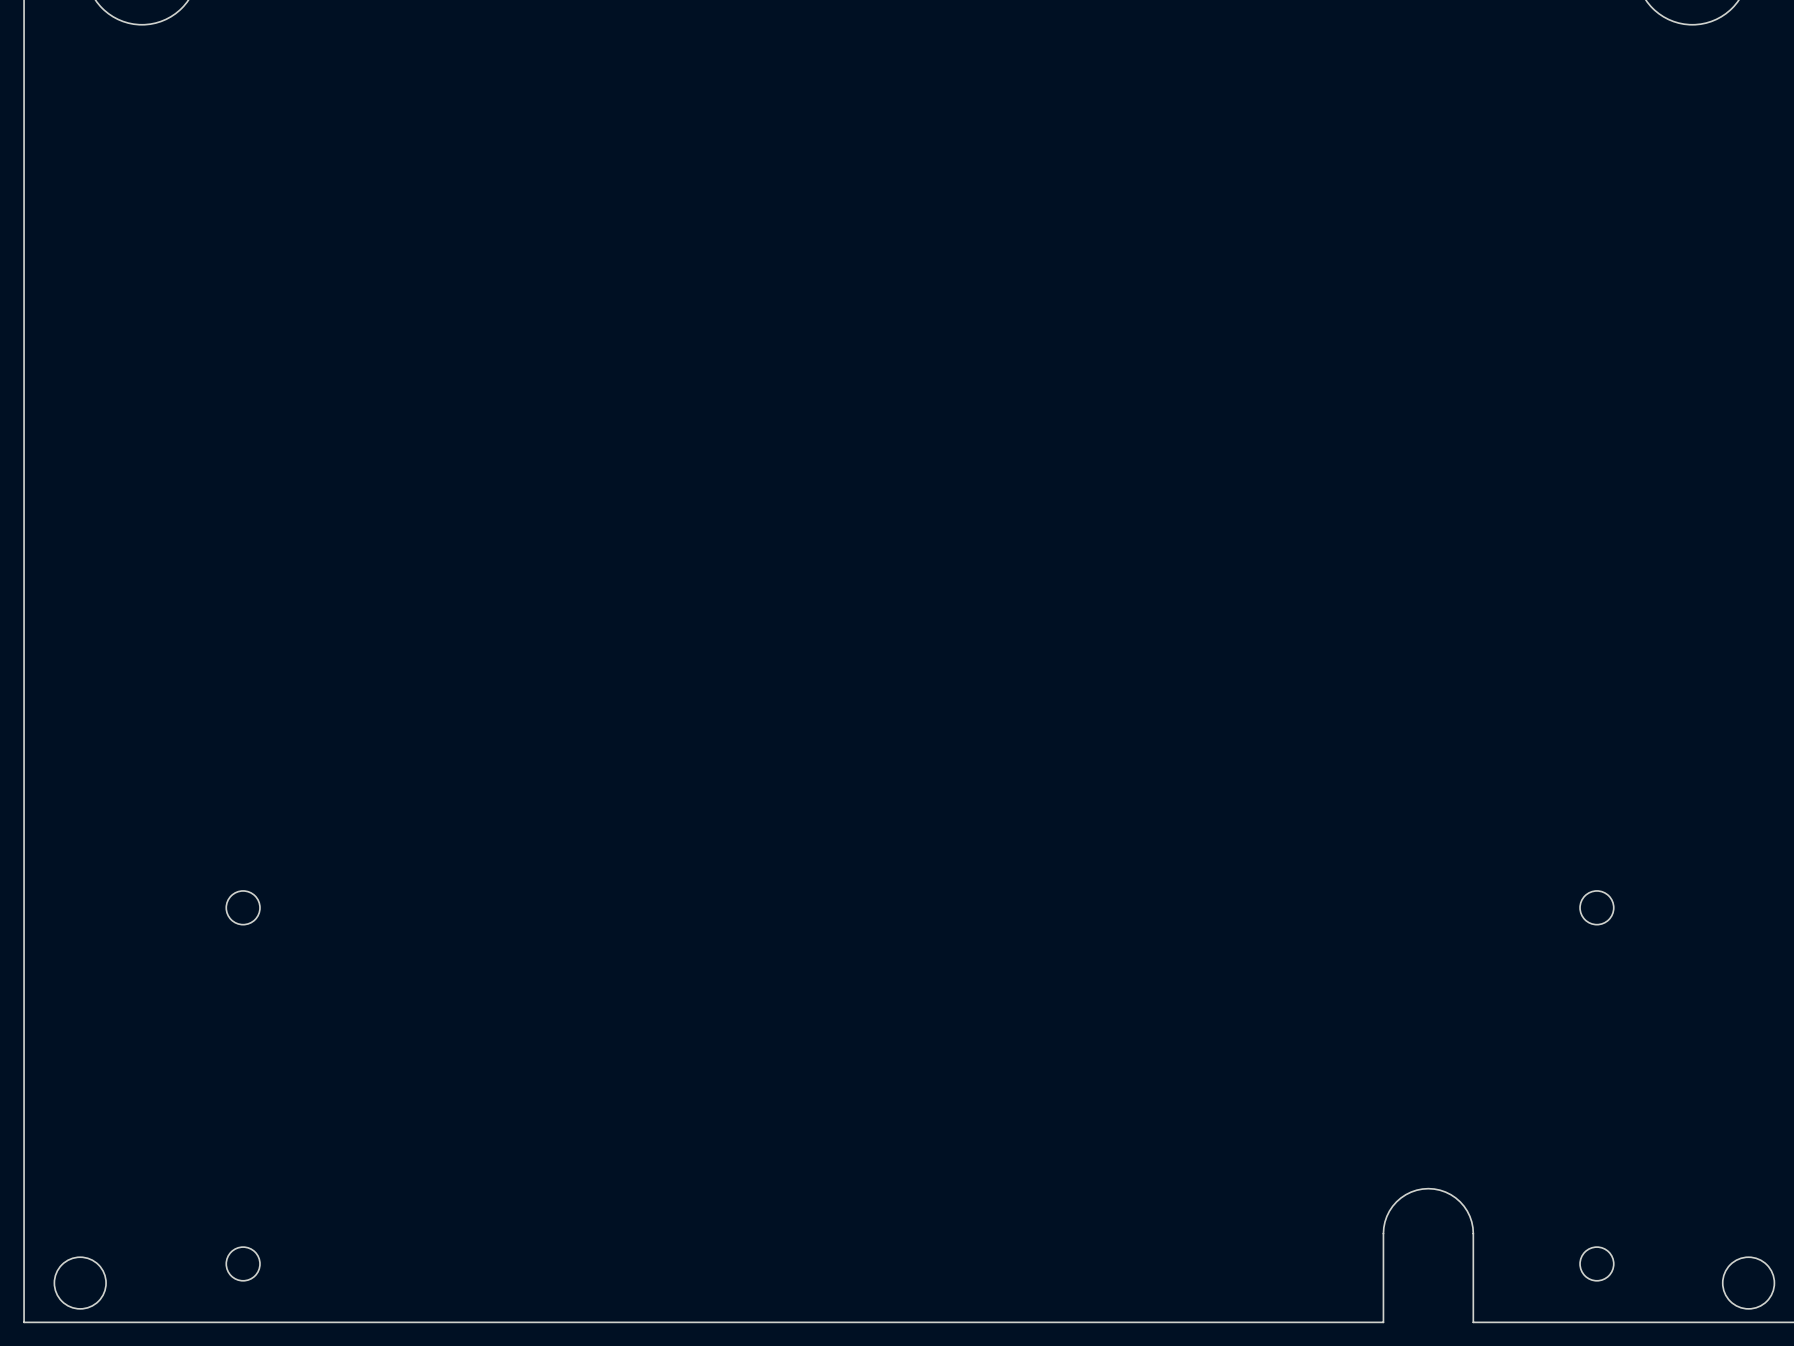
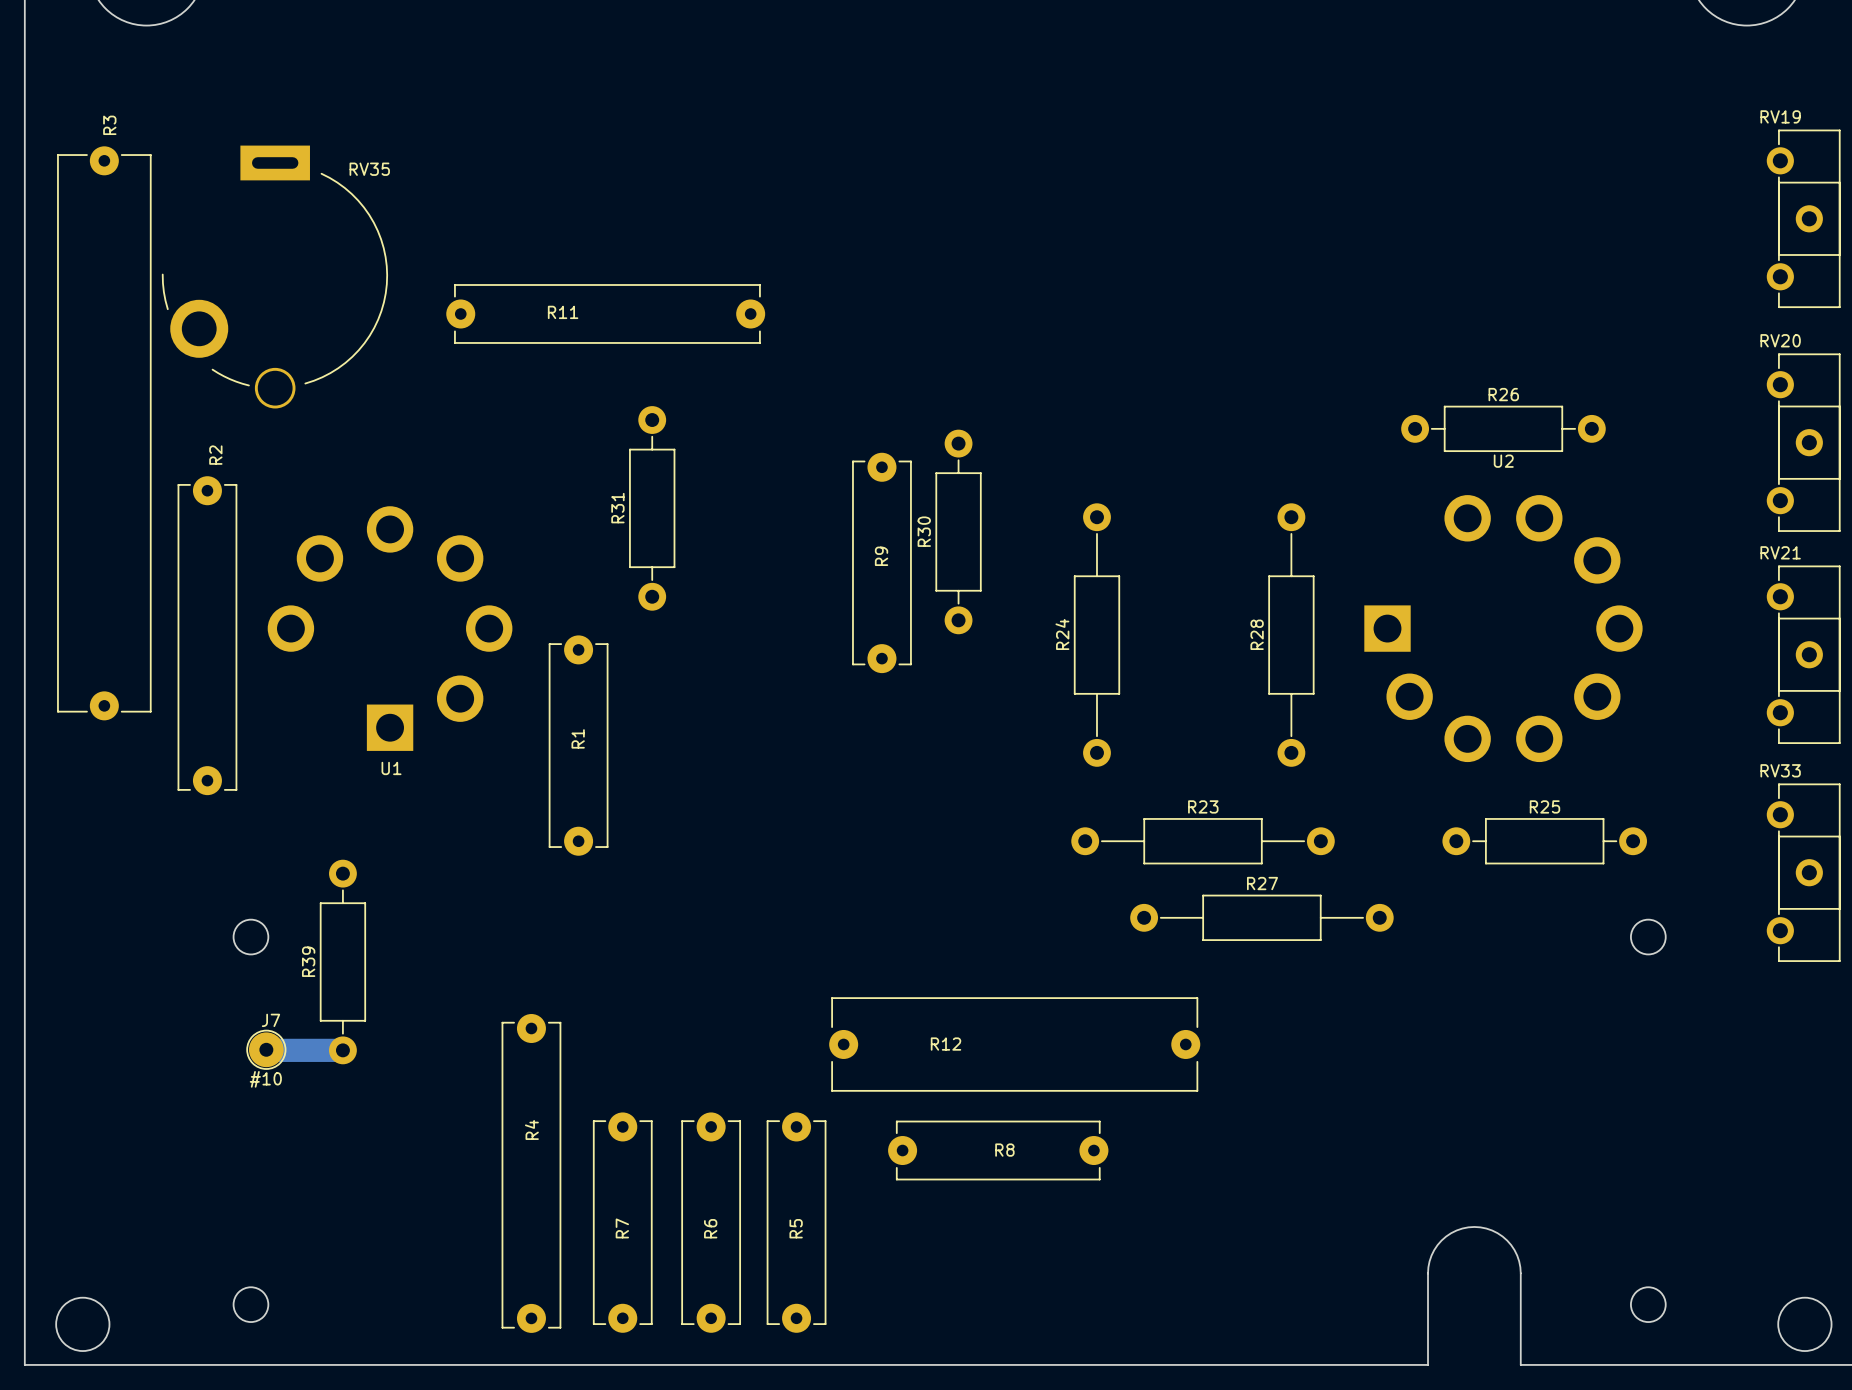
RV19: none -> (1803, 218)
RV35: none -> (274, 277)
R11: none -> (605, 313)
R26: none -> (1503, 428)
R3: none -> (104, 433)
RV20: none -> (1803, 442)
R31: none -> (652, 508)
R30: none -> (958, 531)
R9: none -> (881, 562)
U1: none -> (390, 628)
U2: none -> (1503, 628)
R2: none -> (207, 635)
R24: none -> (1096, 635)
R28: none -> (1291, 635)
RV21: none -> (1803, 654)
R1: none -> (578, 745)
R23: none -> (1203, 841)
R25: none -> (1544, 841)
RV33: none -> (1803, 872)
R27: none -> (1261, 917)
R39: none -> (342, 962)
R12: none -> (1014, 1044)
J7: none -> #10 (266, 1049)
bottom track: none -> (272, 1050) (342, 1050)
R8: none -> (998, 1150)
R4: none -> (531, 1173)
R7: none -> (622, 1222)
R6: none -> (711, 1222)
R5: none -> (796, 1222)

